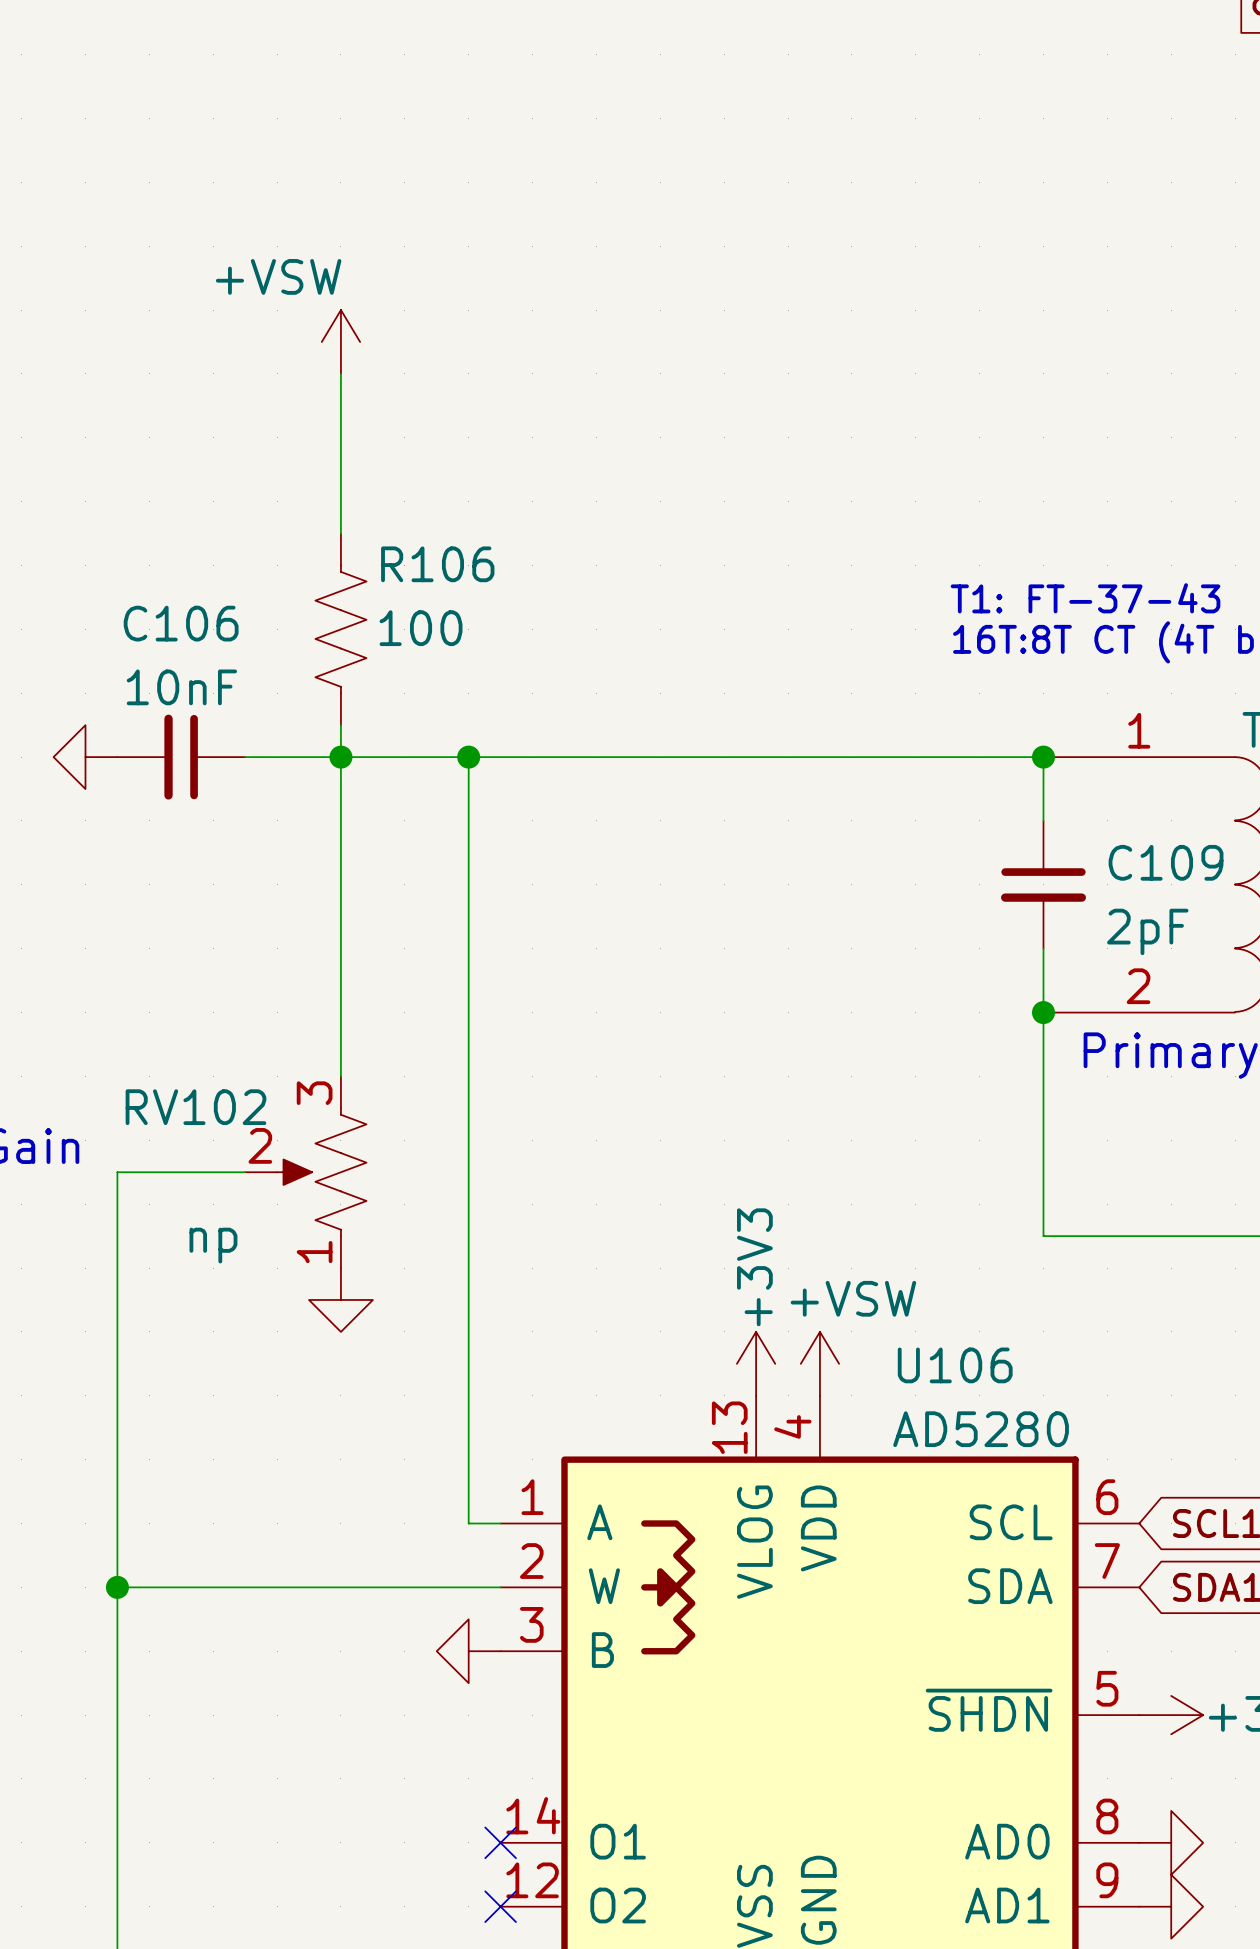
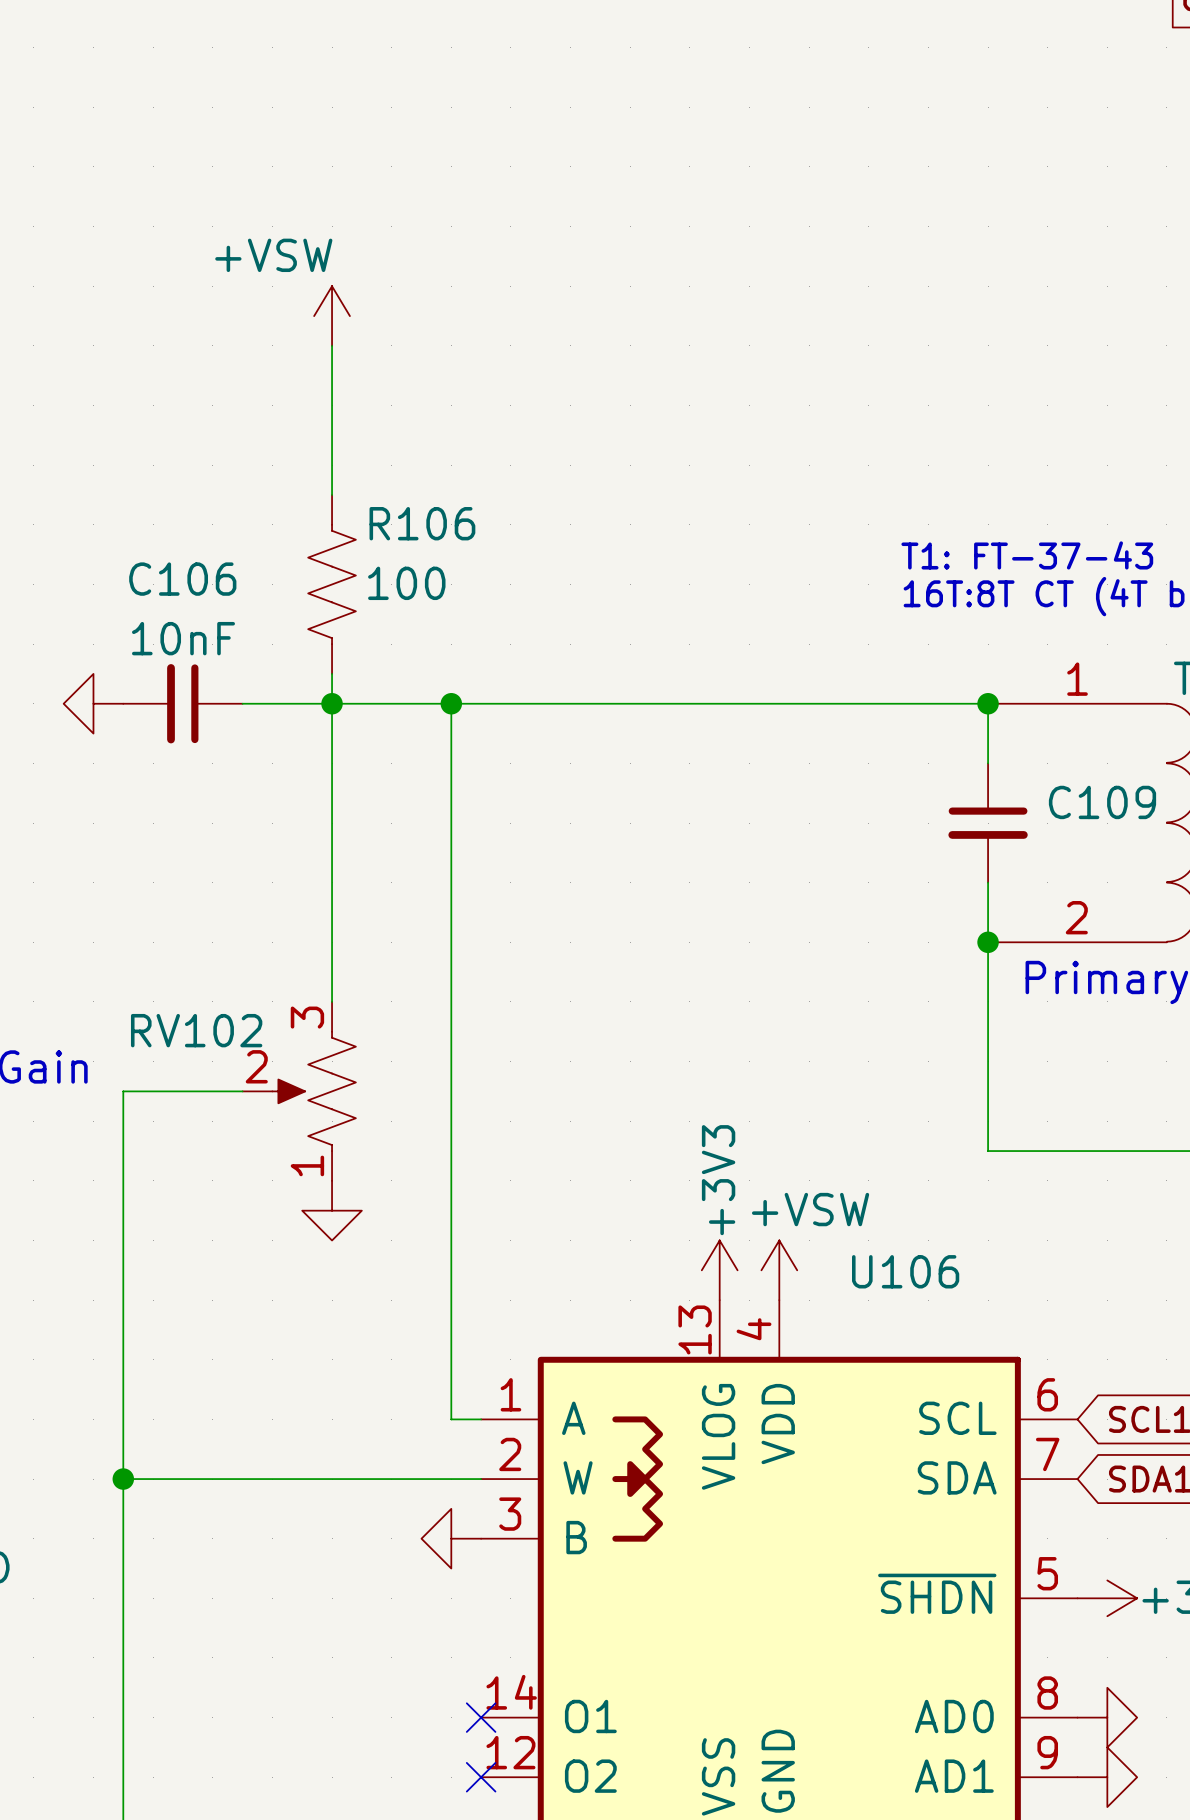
C109 value: 2pF (1147, 931) -> none
RV102 value: np (213, 1245) -> none
U106 value: AD5280 (981, 1429) -> none

